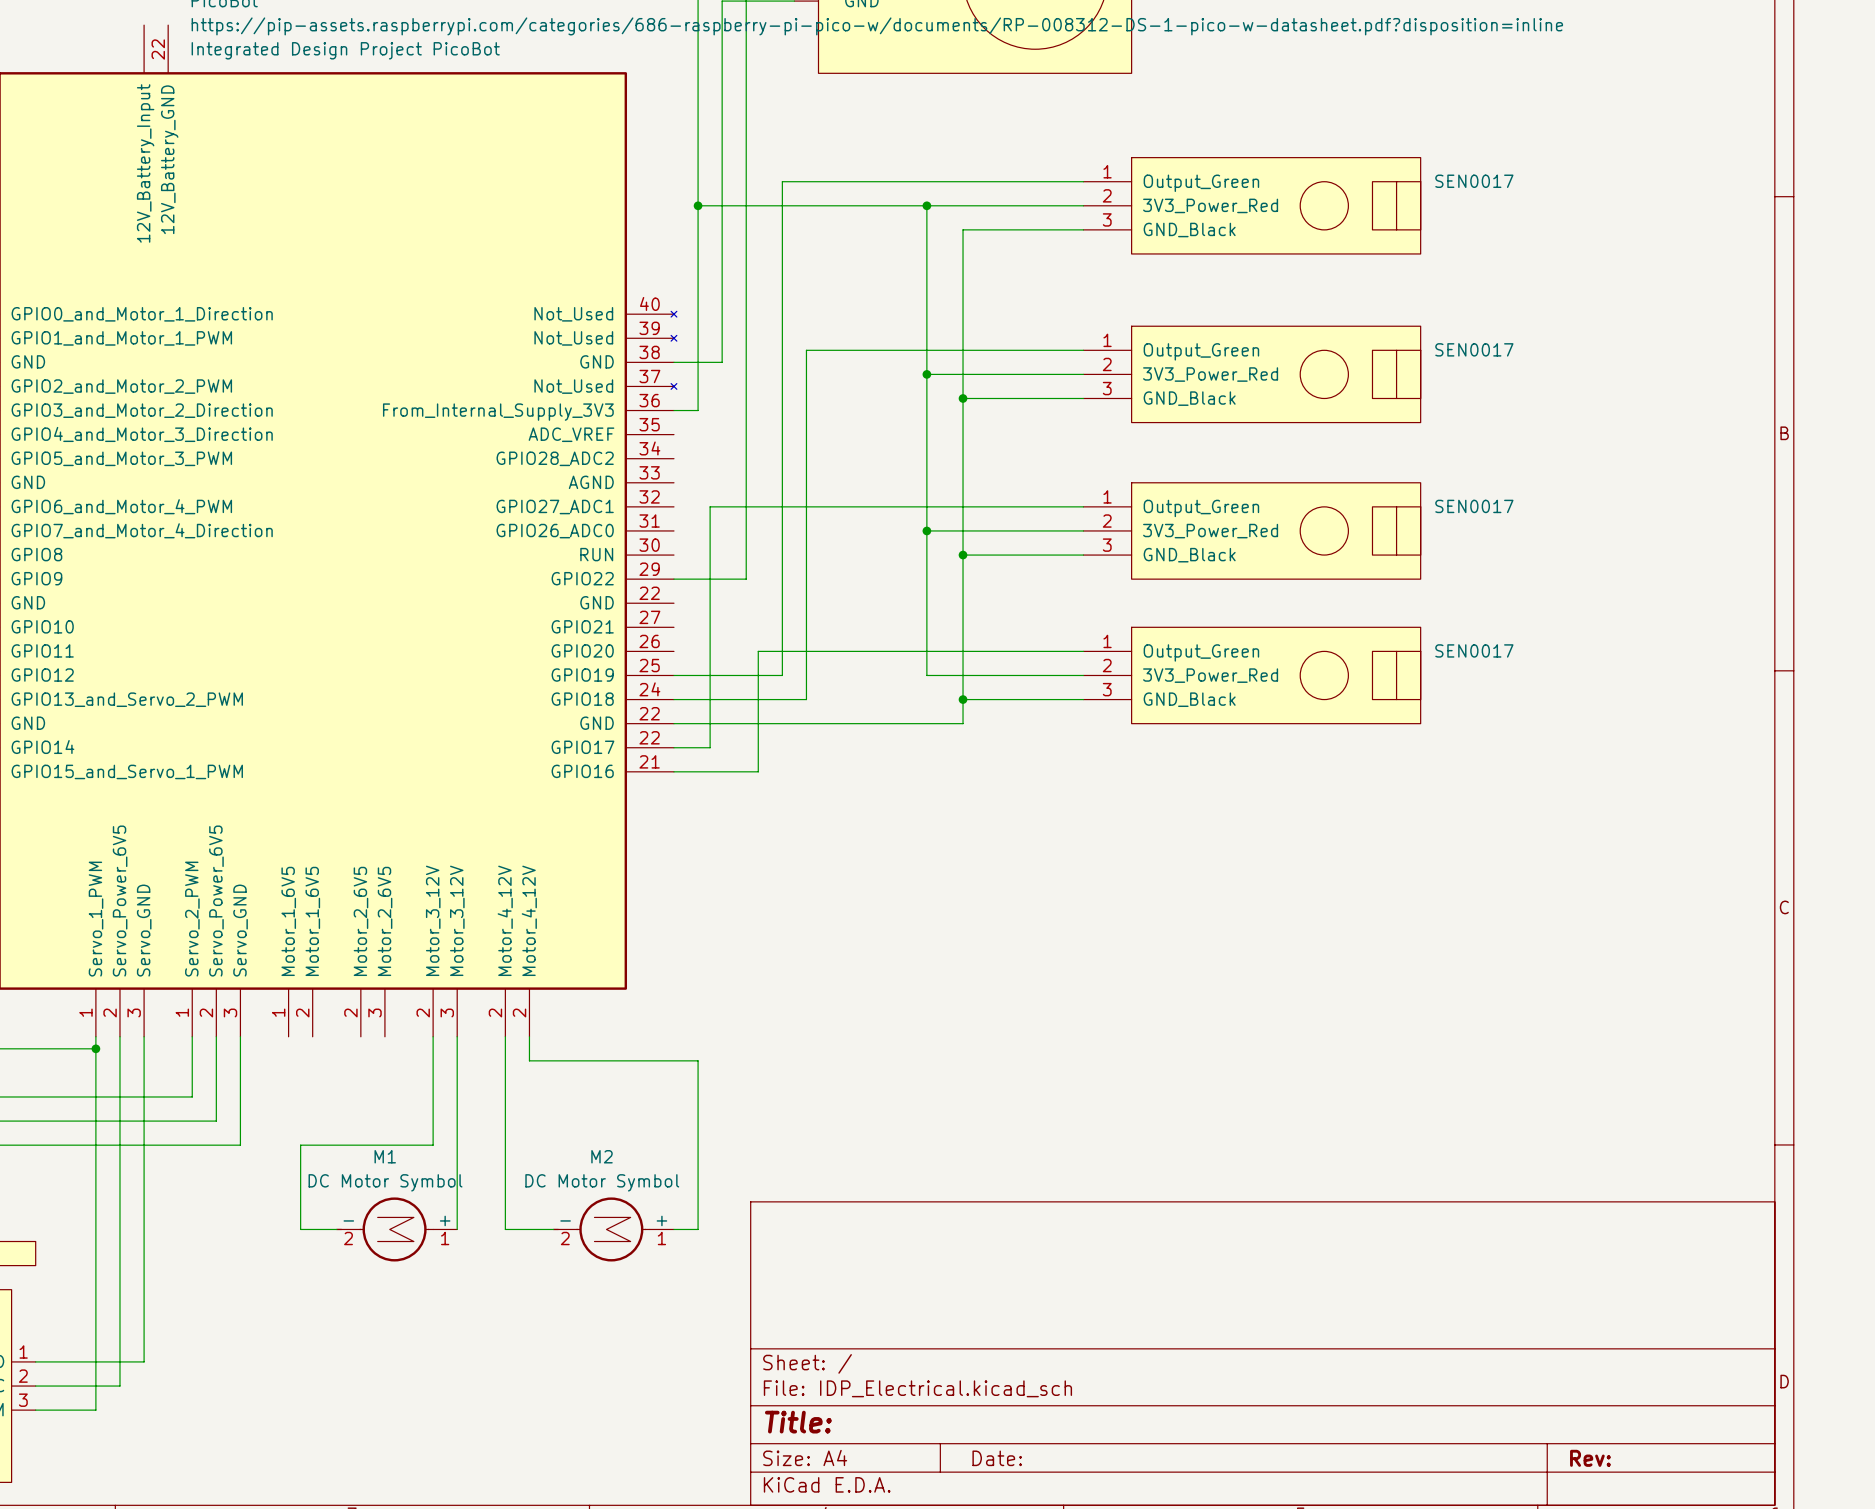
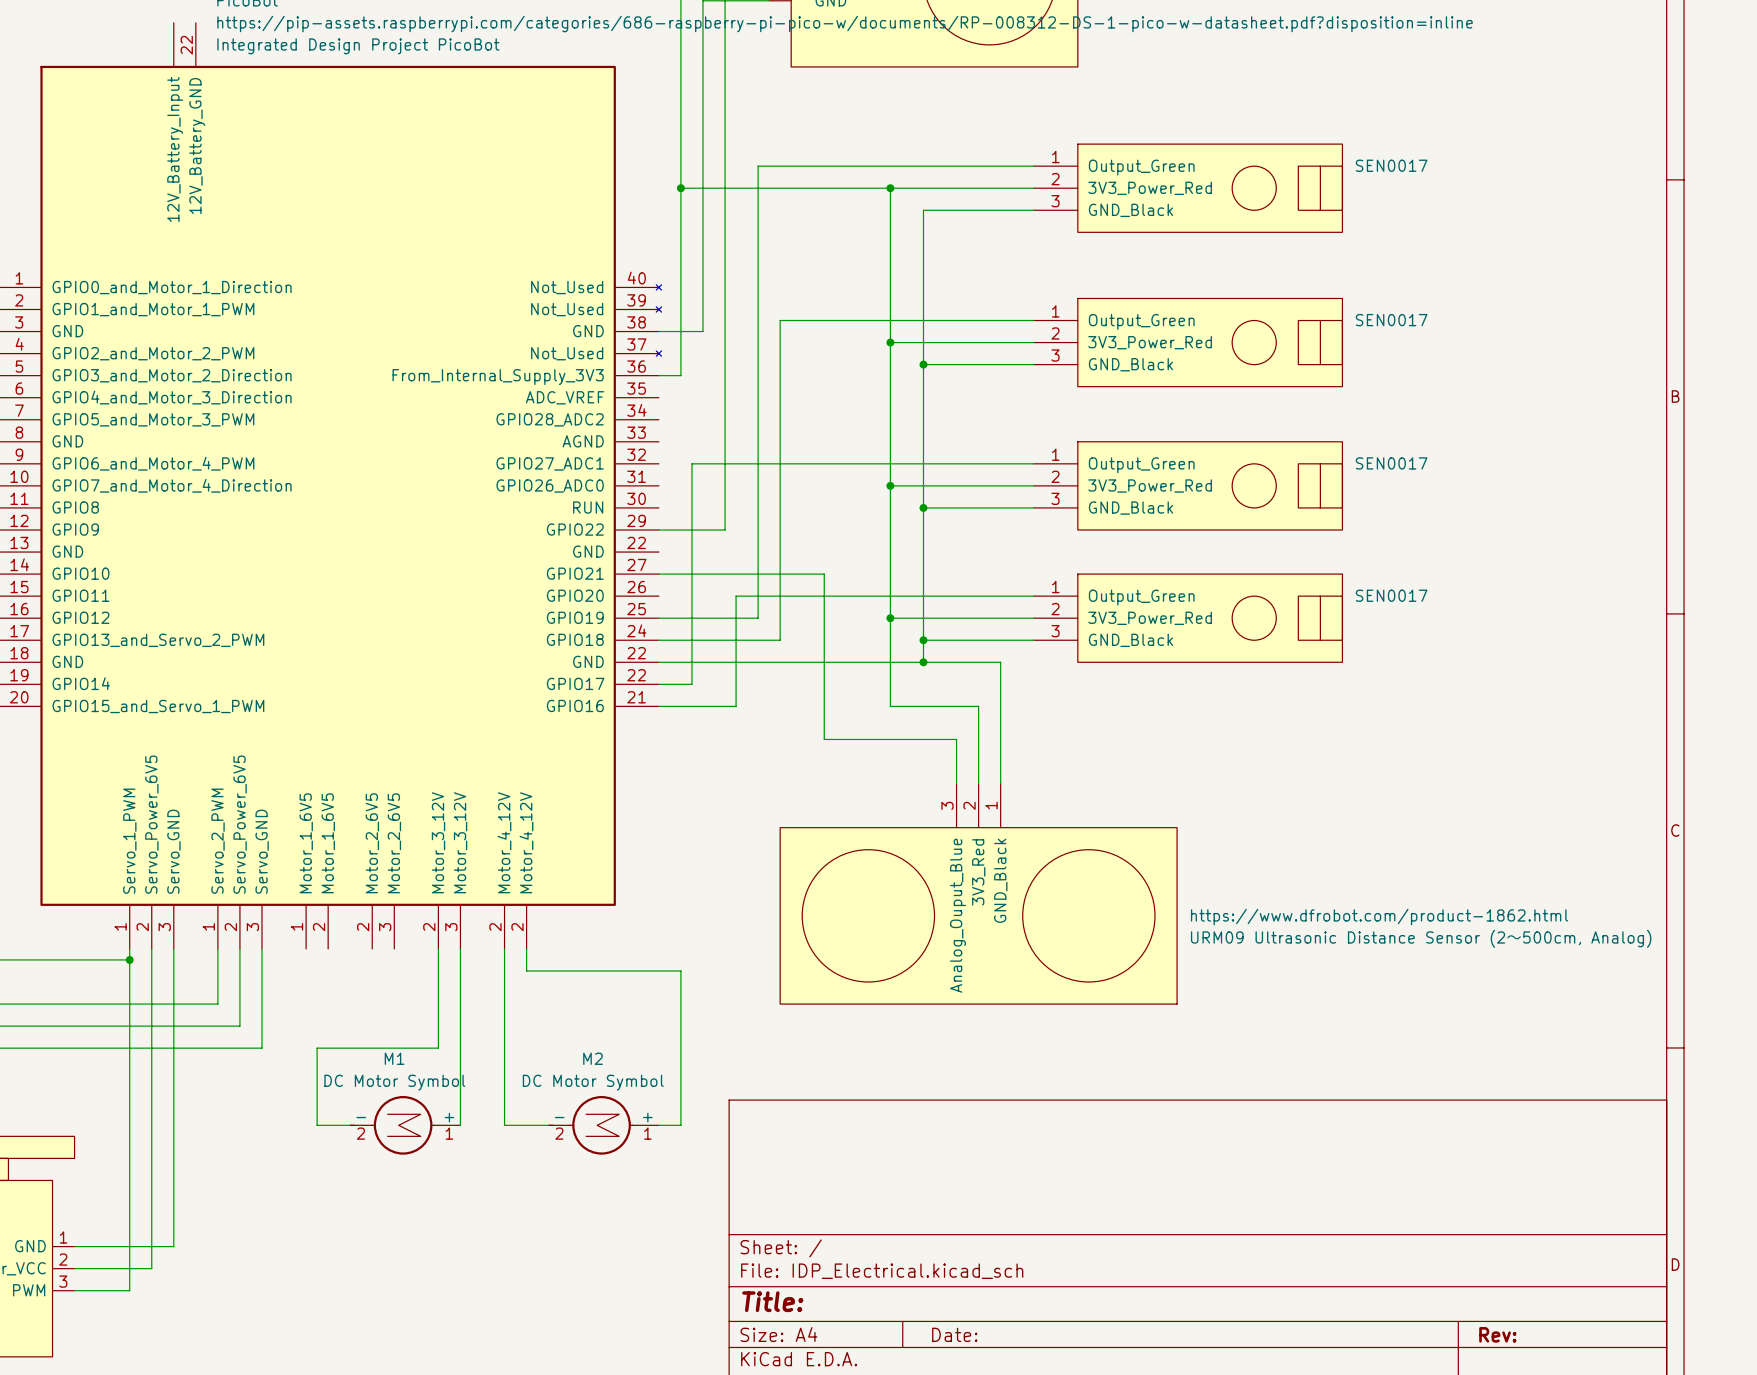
wire: none -> (658, 574) (824, 574) (824, 739) (956, 739) (956, 783)
wire: none -> (890, 618) (890, 706) (978, 706) (978, 783)
junction: none -> (890, 618)
wire: none -> (923, 662) (1000, 662) (1000, 783)
junction: none -> (923, 662)
part: none -> (978, 893)

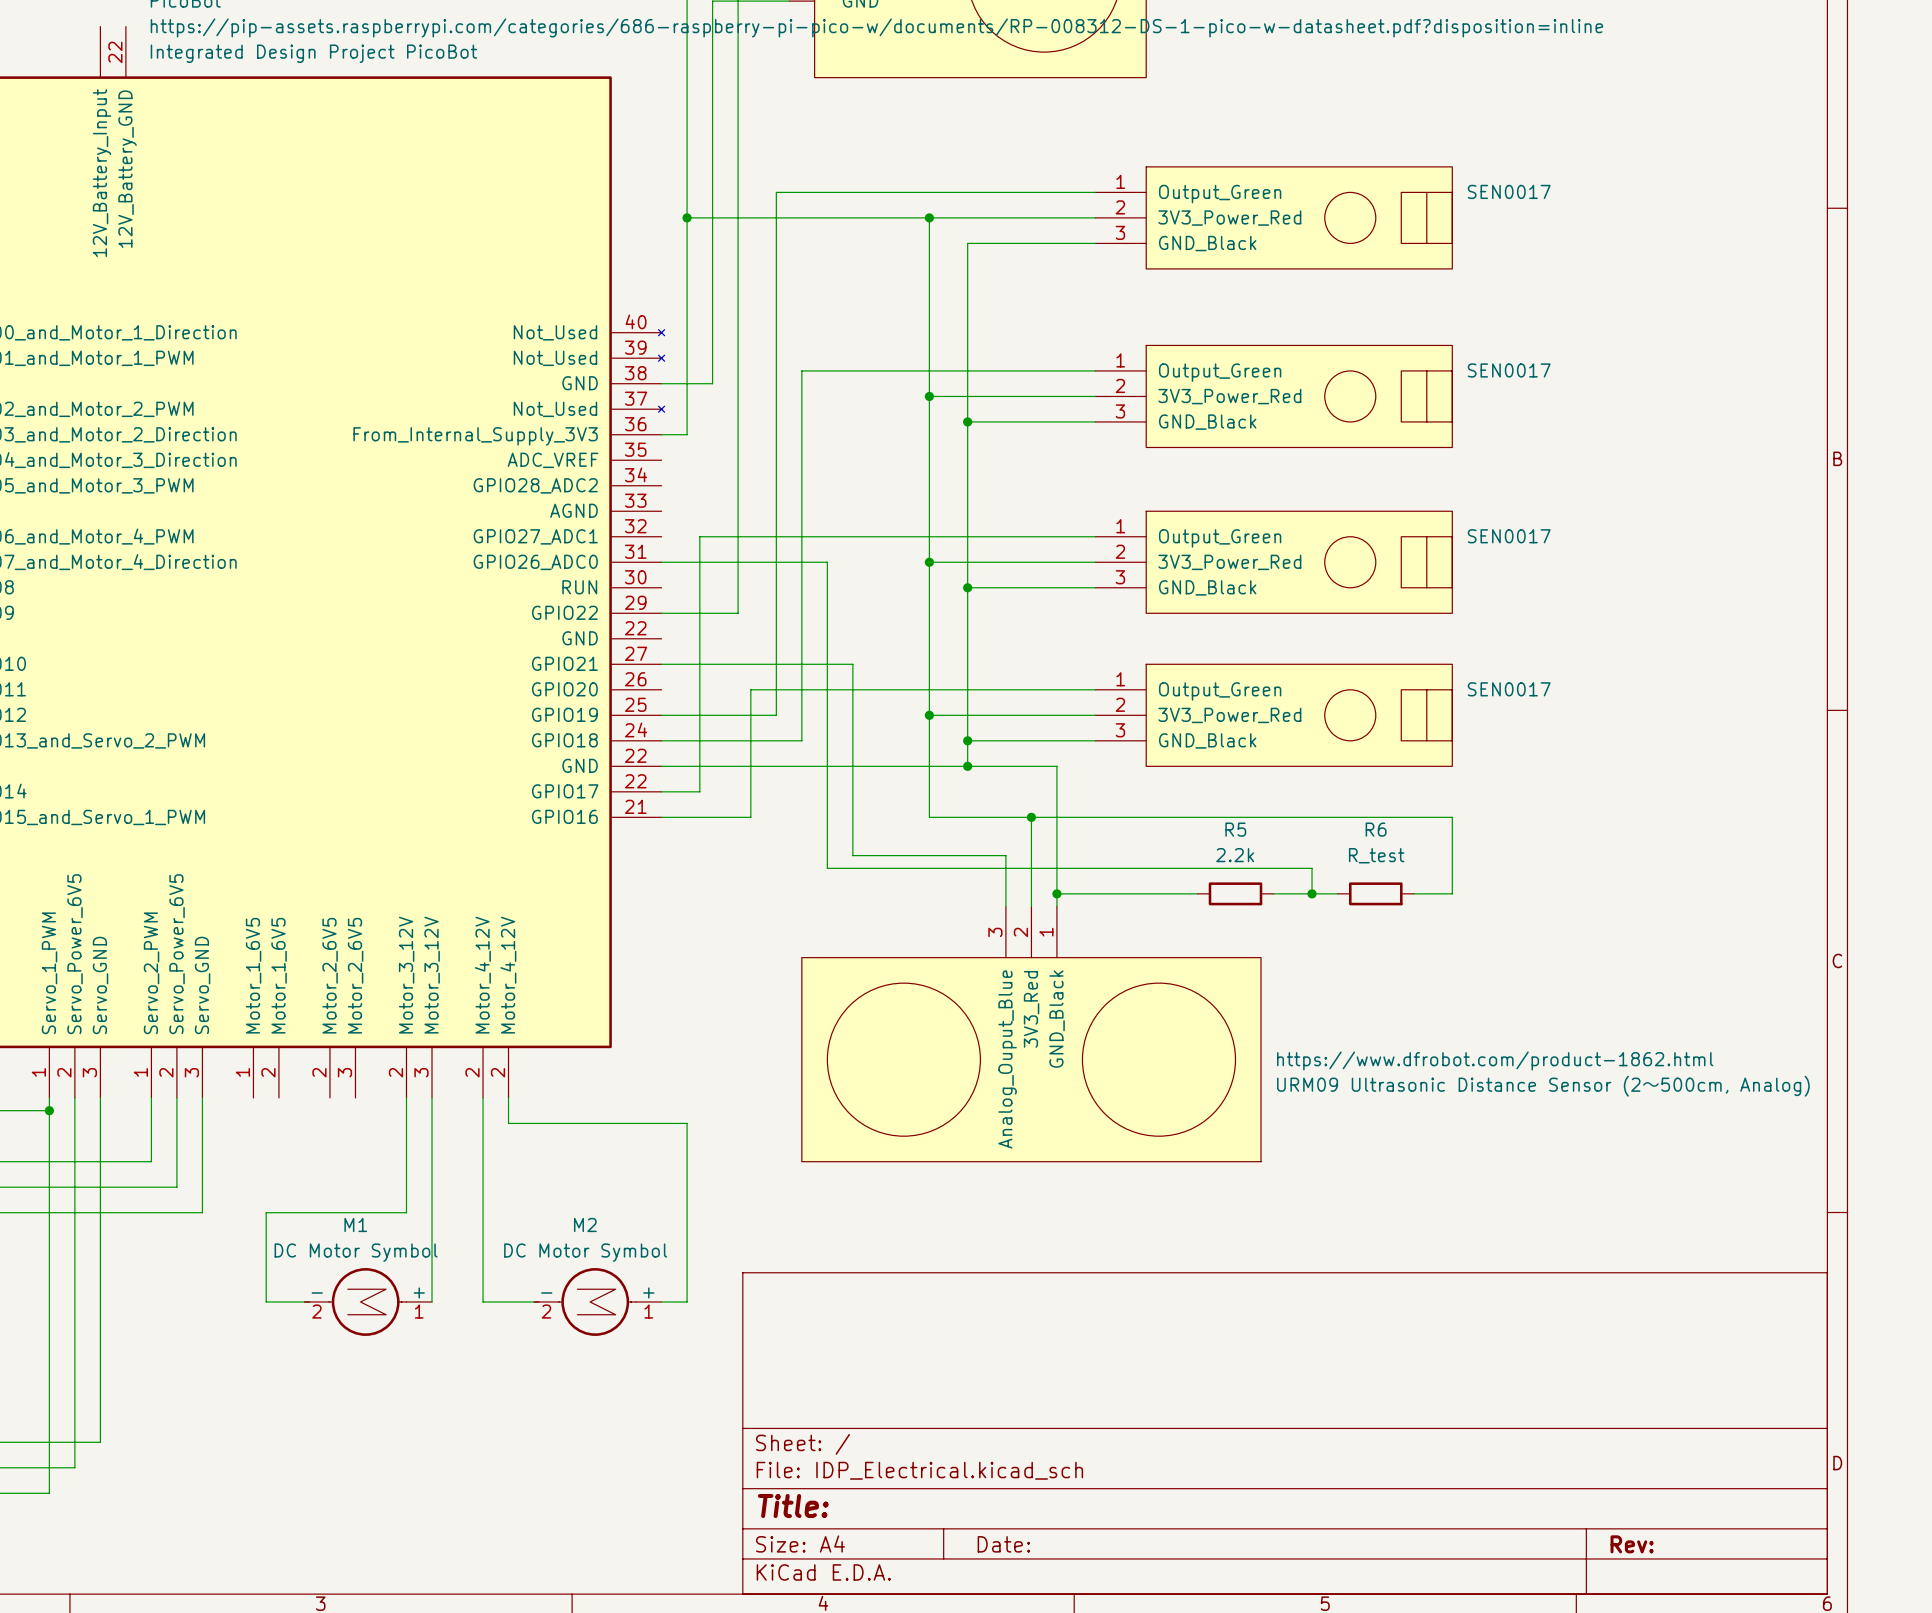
wire: none -> (661, 562) (827, 562) (827, 868) (1312, 868) (1312, 893)
wire: none -> (1031, 817) (1452, 817) (1452, 893) (1414, 893)
junction: none -> (1031, 817)
wire: none -> (1056, 893) (1197, 893)
junction: none -> (1056, 893)
R5: none -> 2.2k (1235, 893)
wire: none -> (1273, 893) (1337, 893)
junction: none -> (1312, 893)
R6: none -> R_test (1375, 893)

